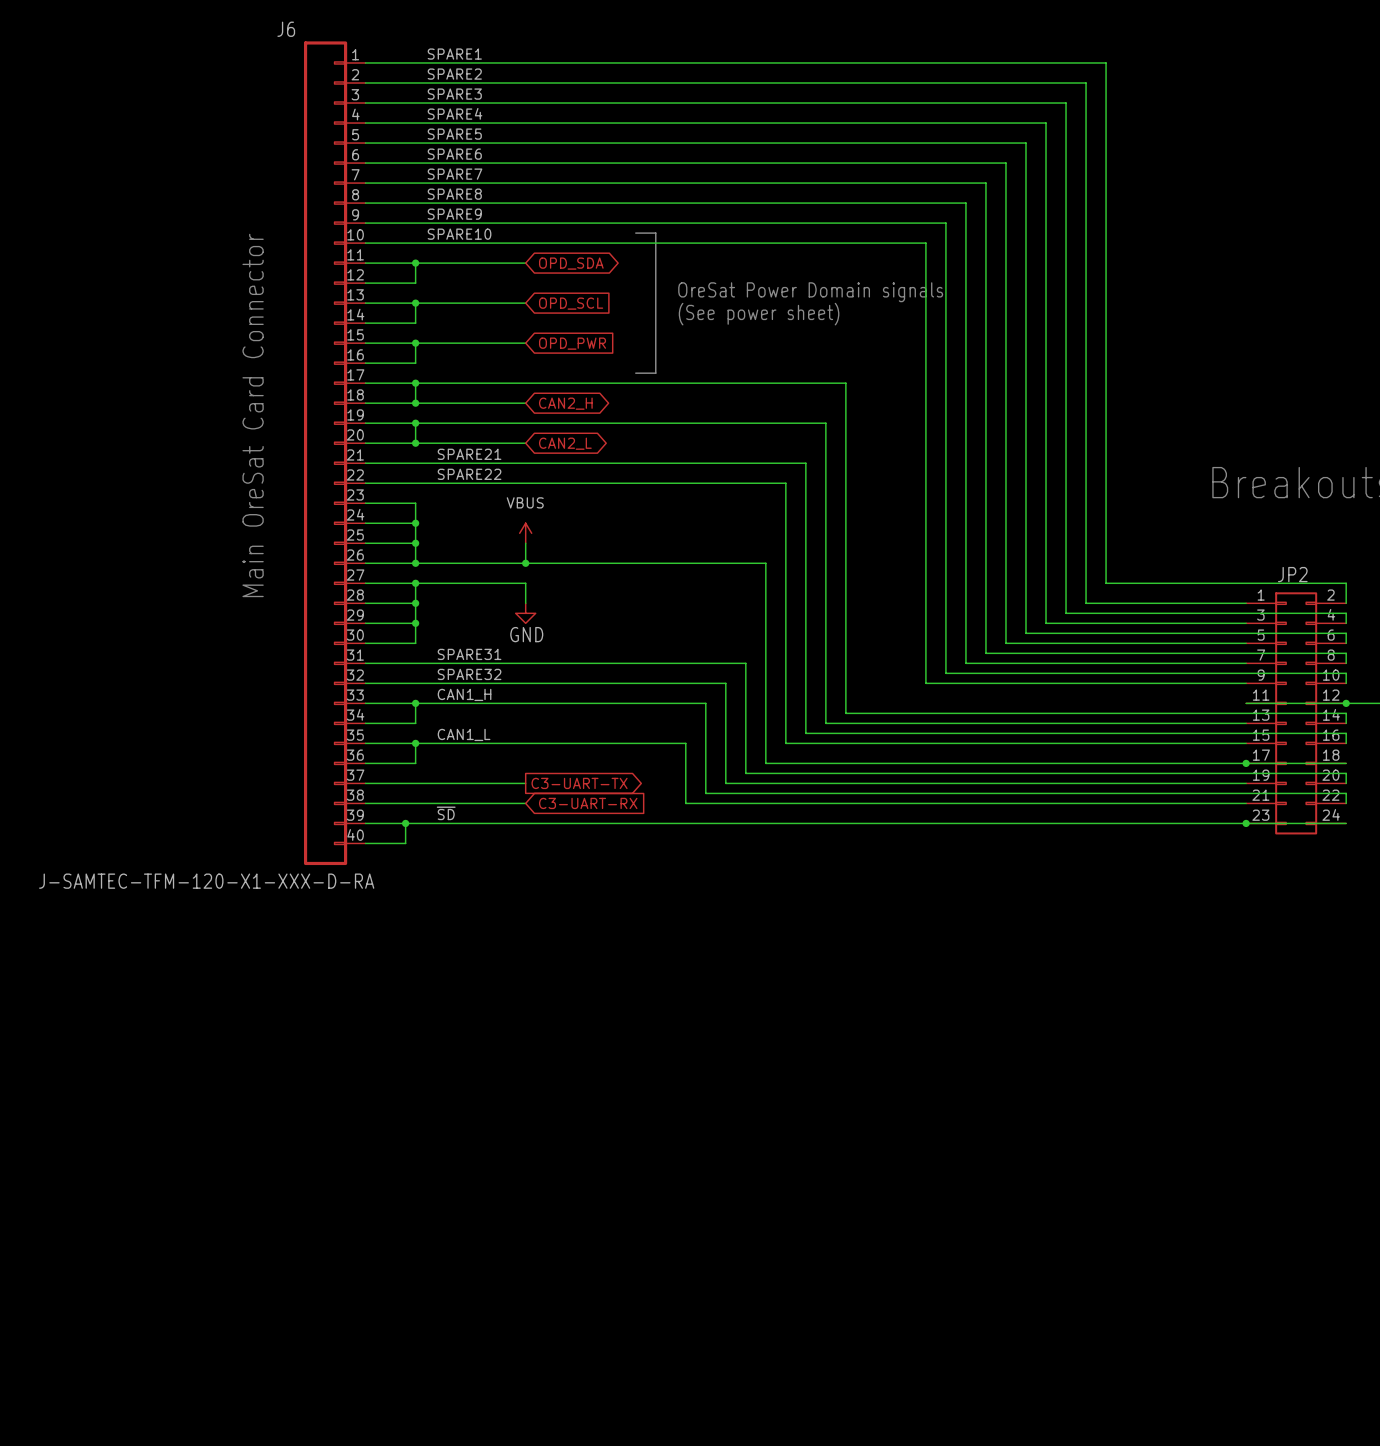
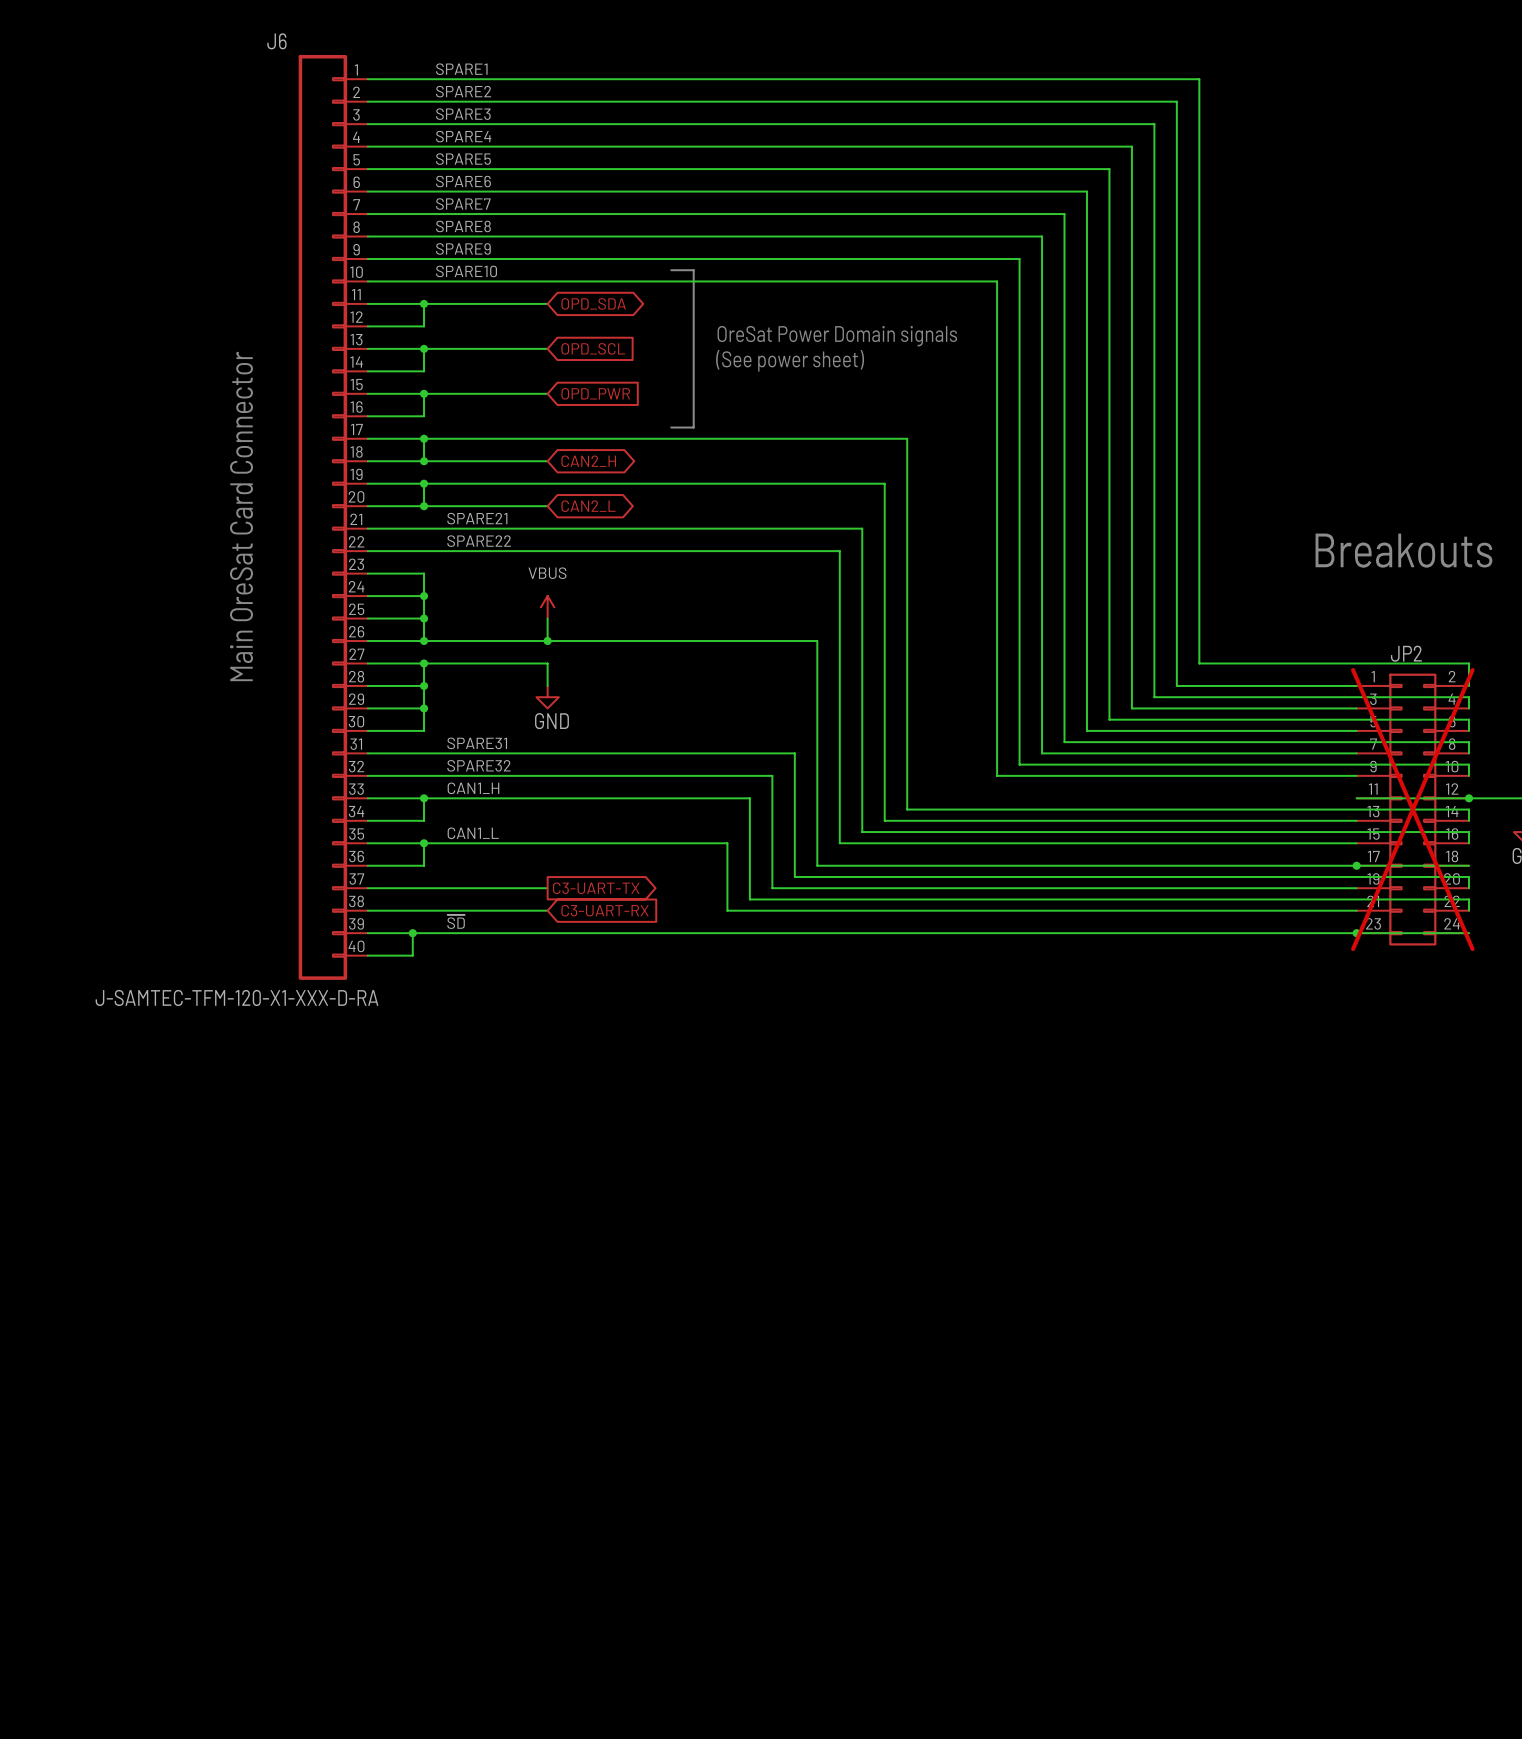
JP2 do-not-place cross: none -> (1412, 809)

